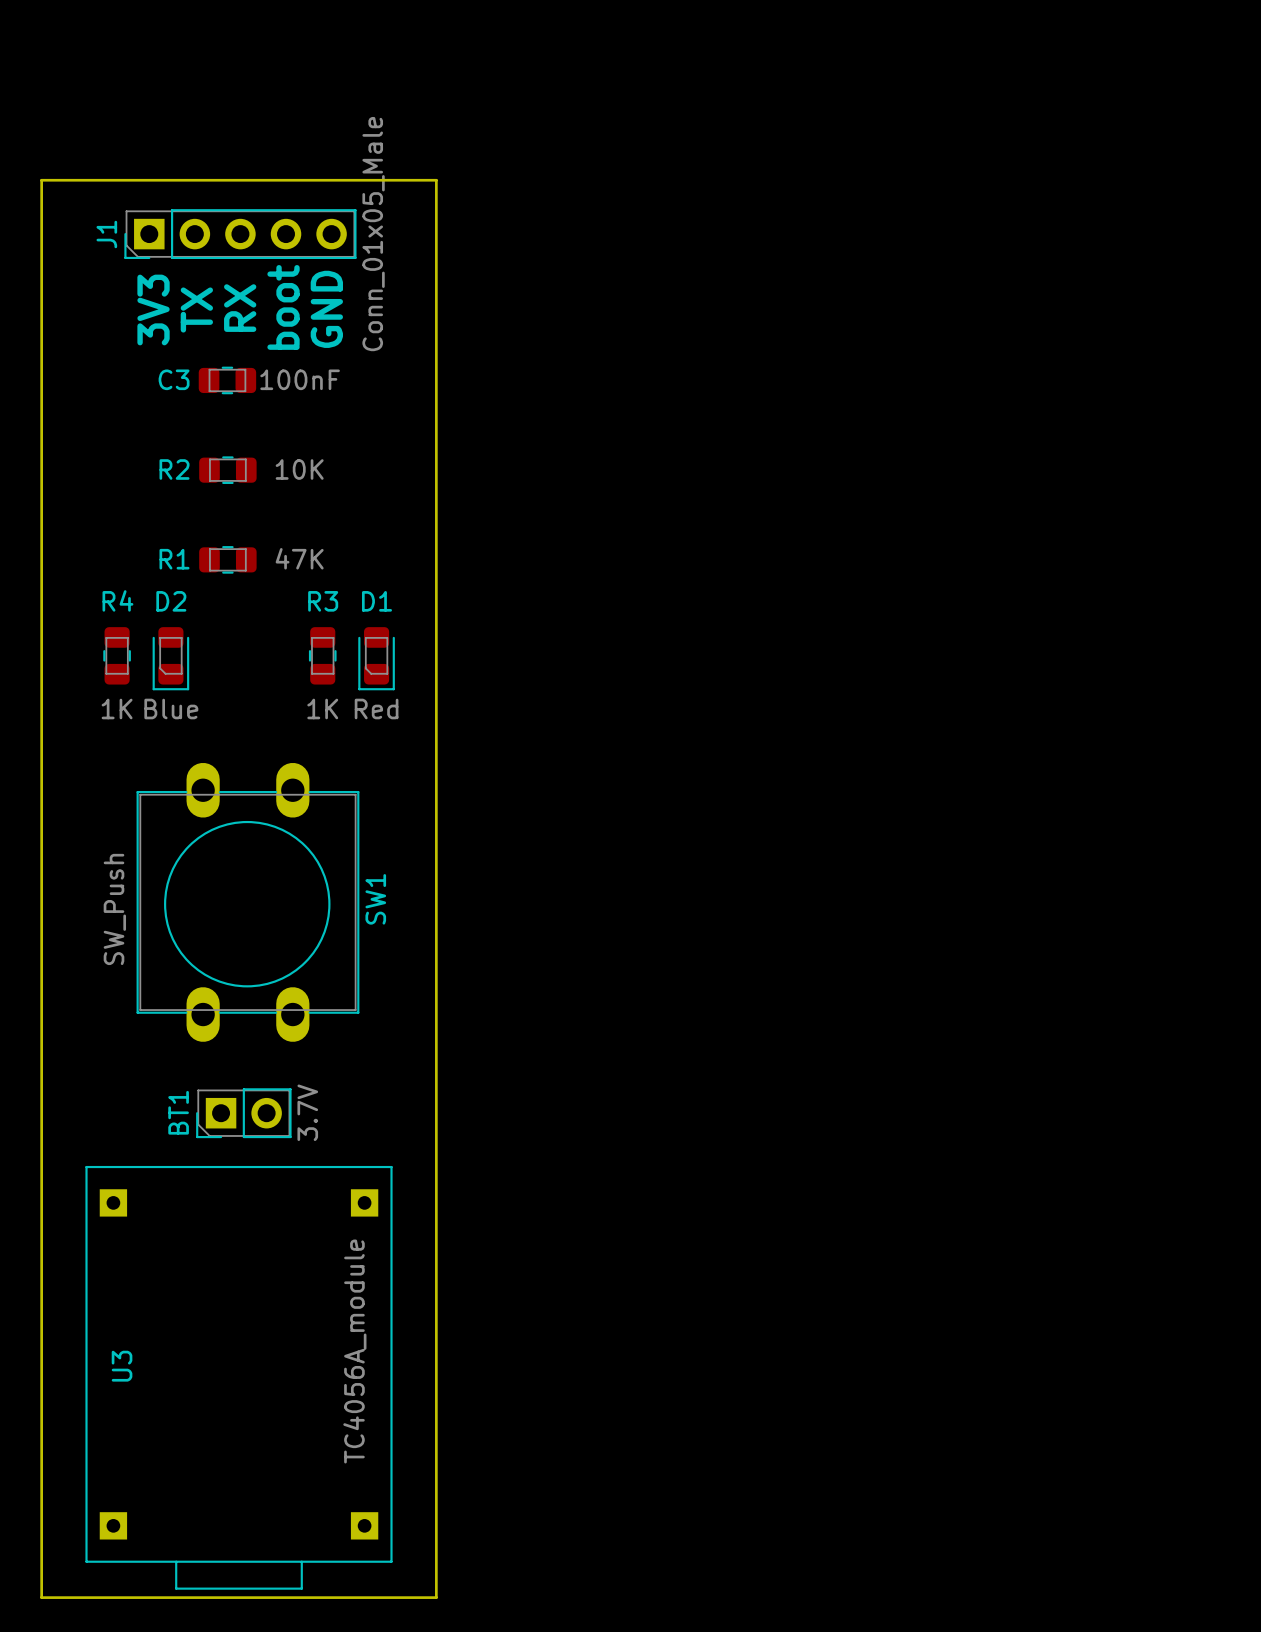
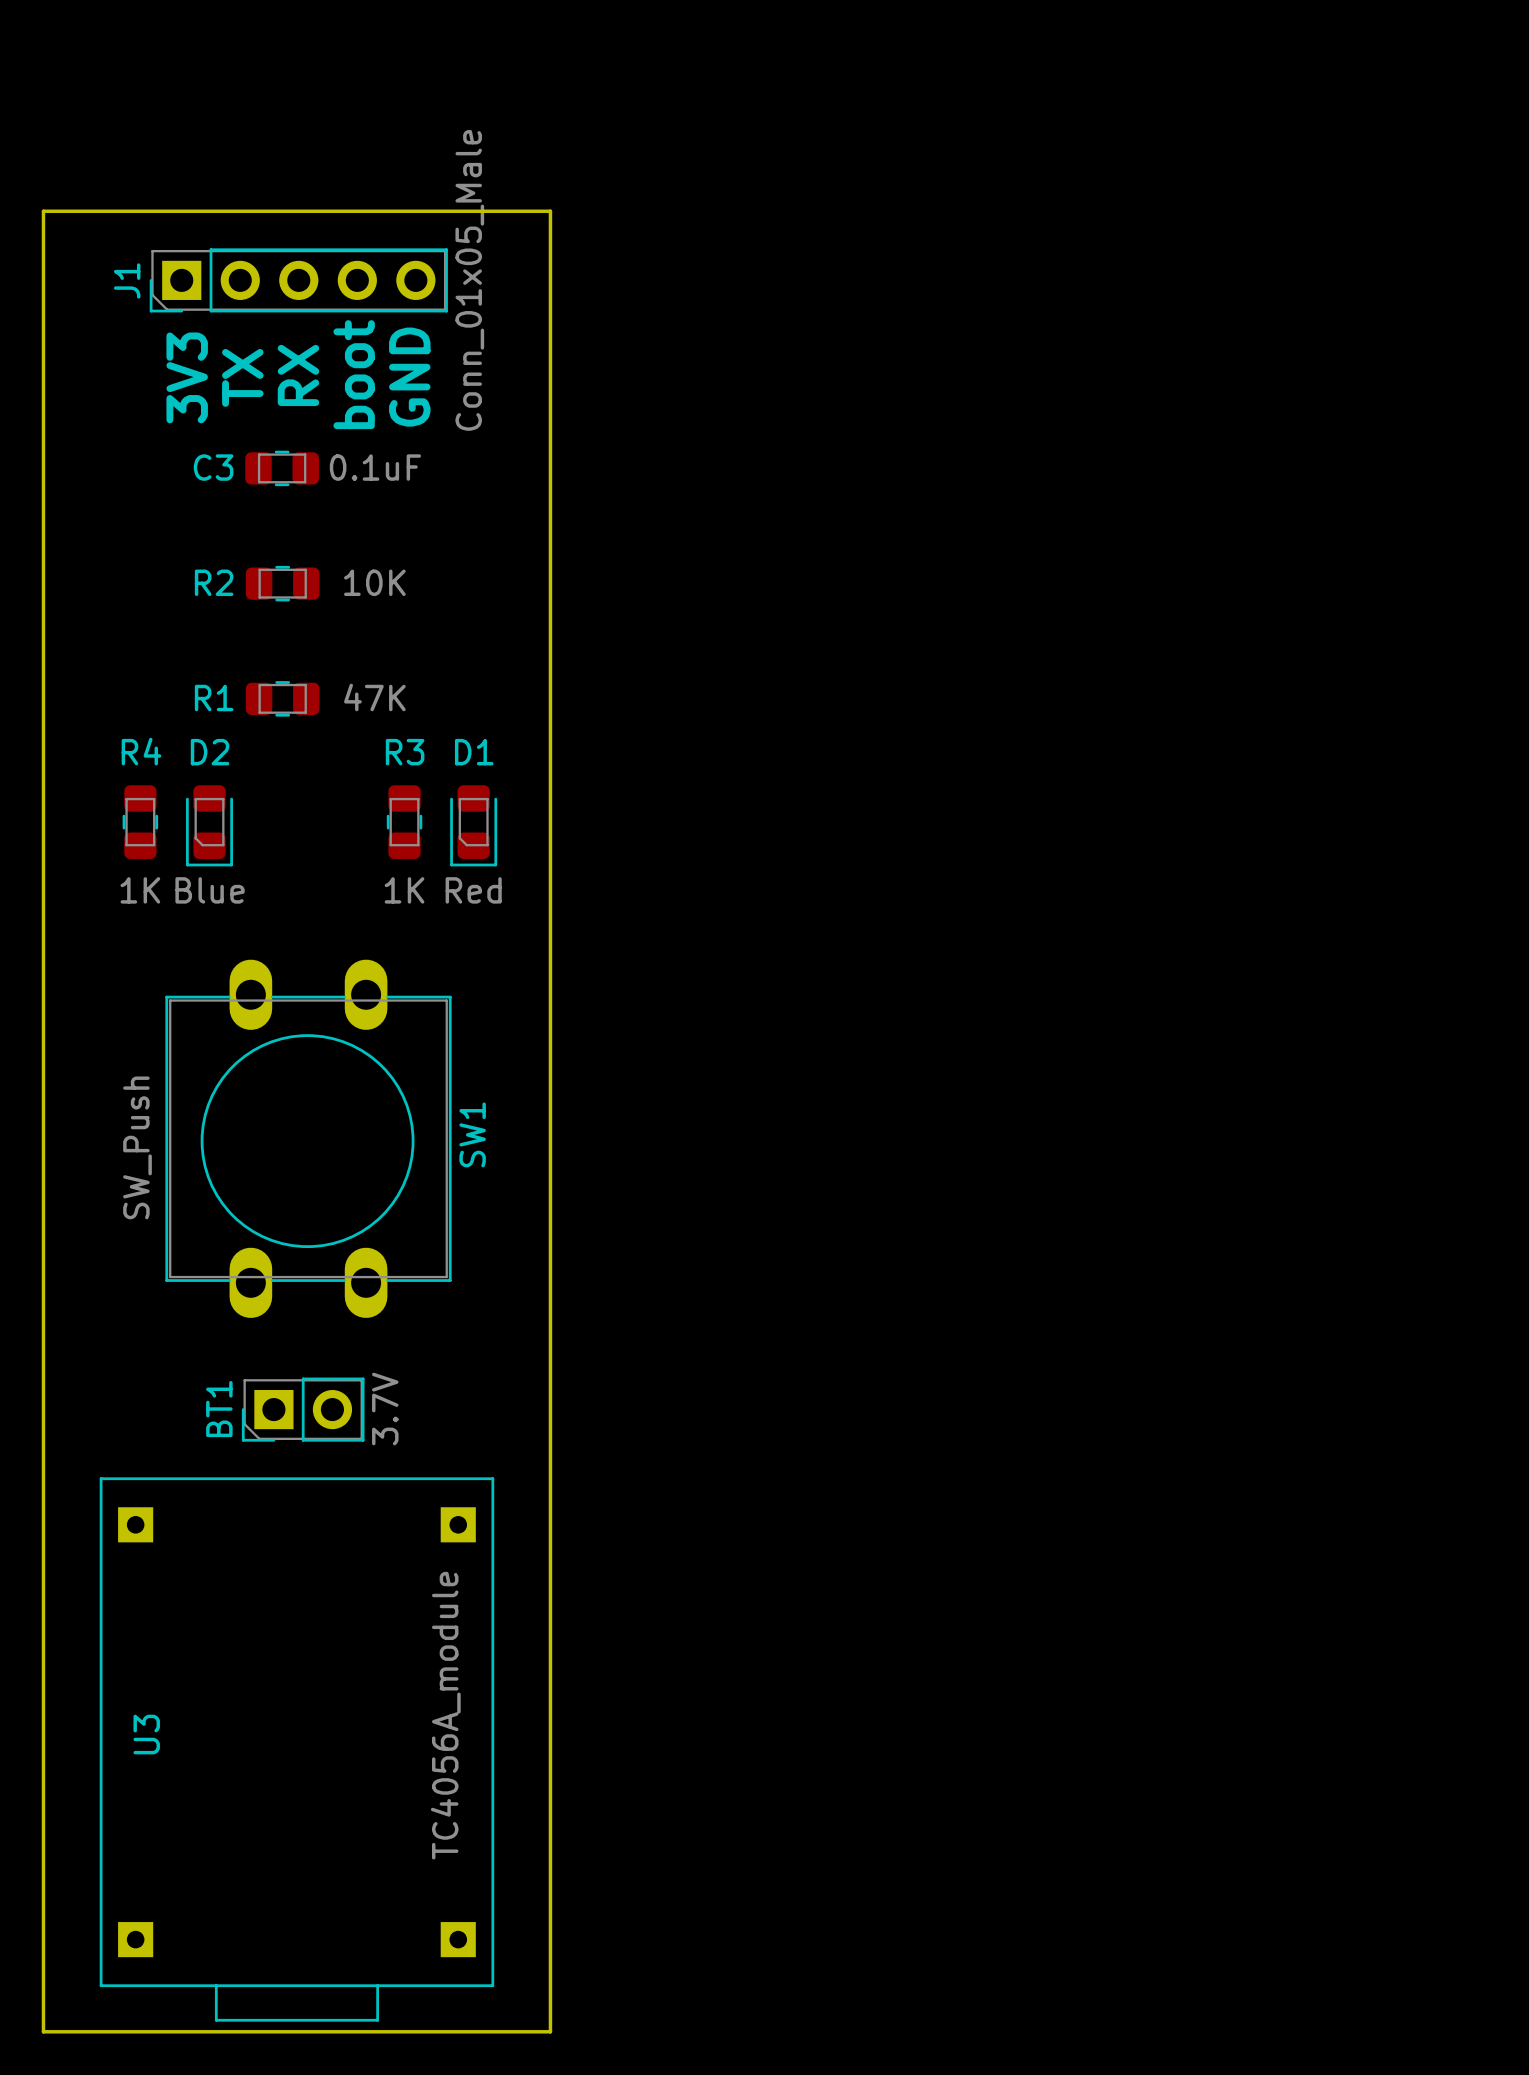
C3 value: 100nF (300, 379) -> 0.1uF (375, 467)

